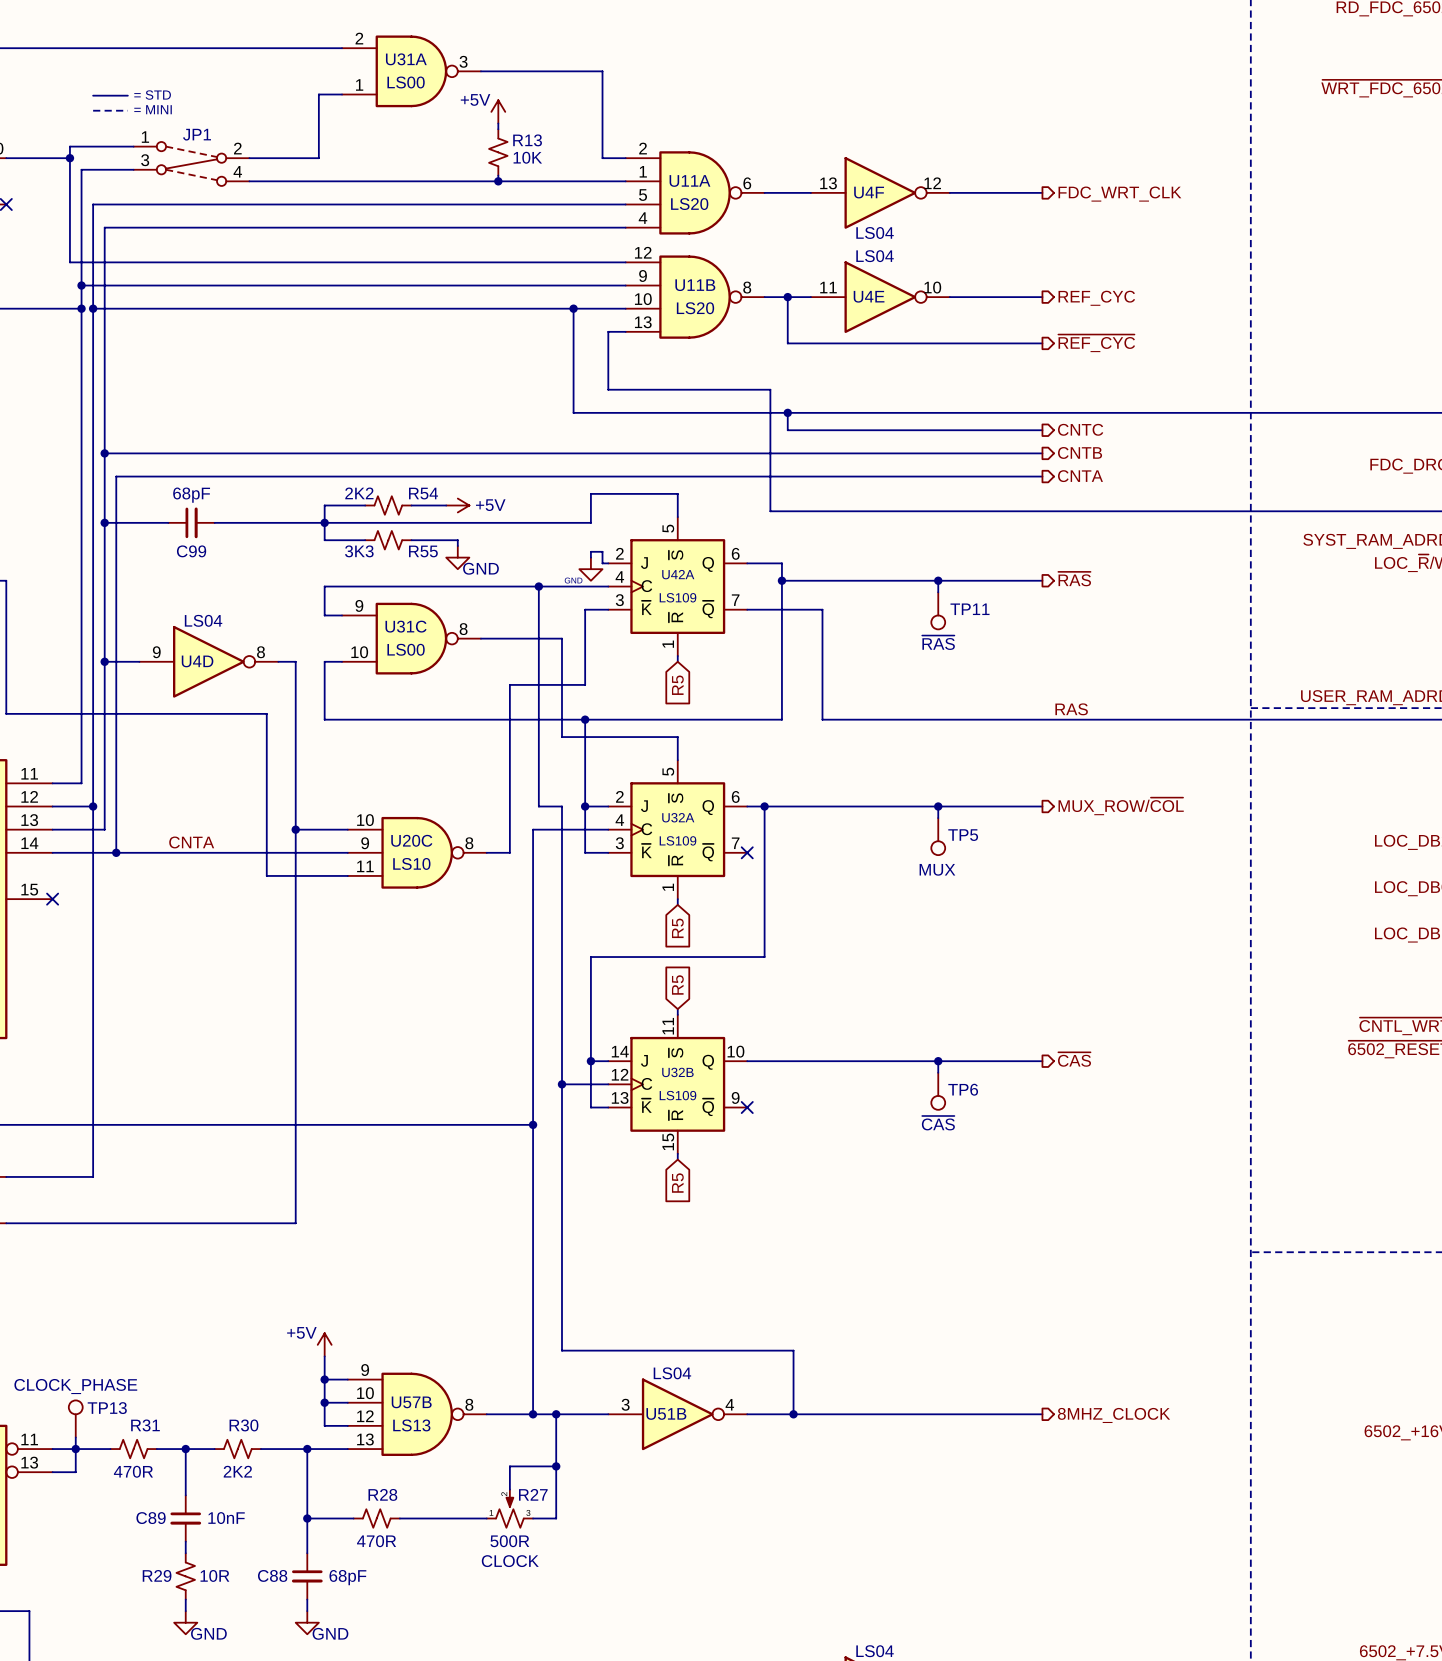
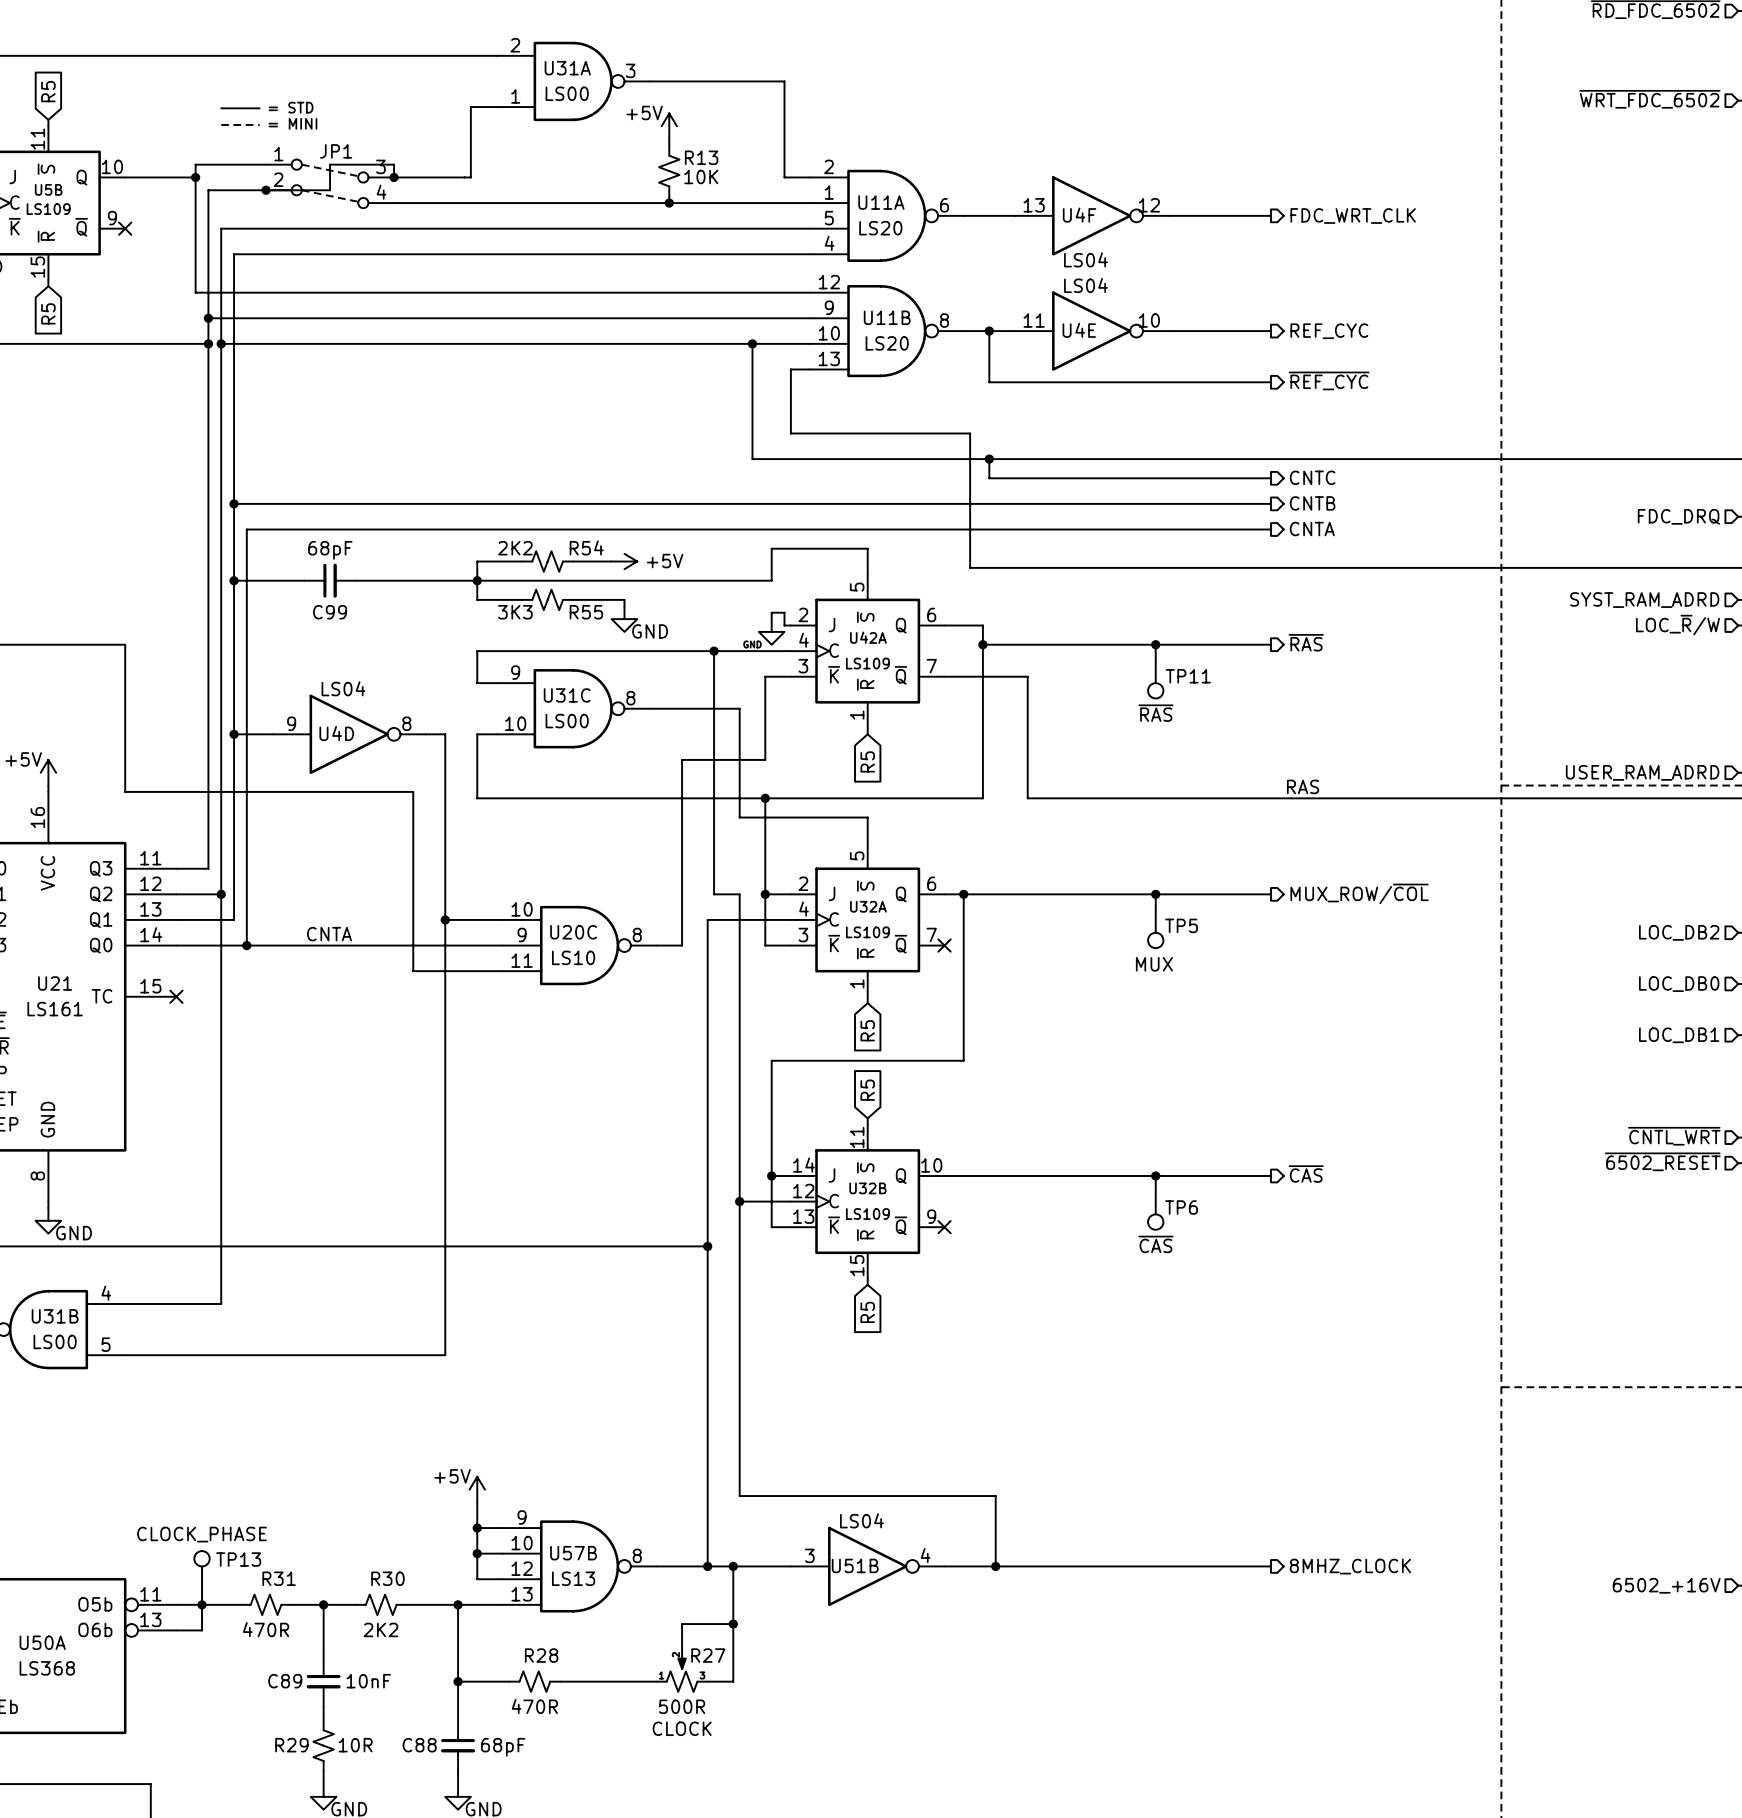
JP1 symbol: [133, 141, 250, 186] -> [266, 159, 395, 209]
wire: none -> (394, 177) (394, 164) (330, 164) (330, 190) (266, 190)
junction: none -> (394, 177)
junction: none -> (266, 190)

